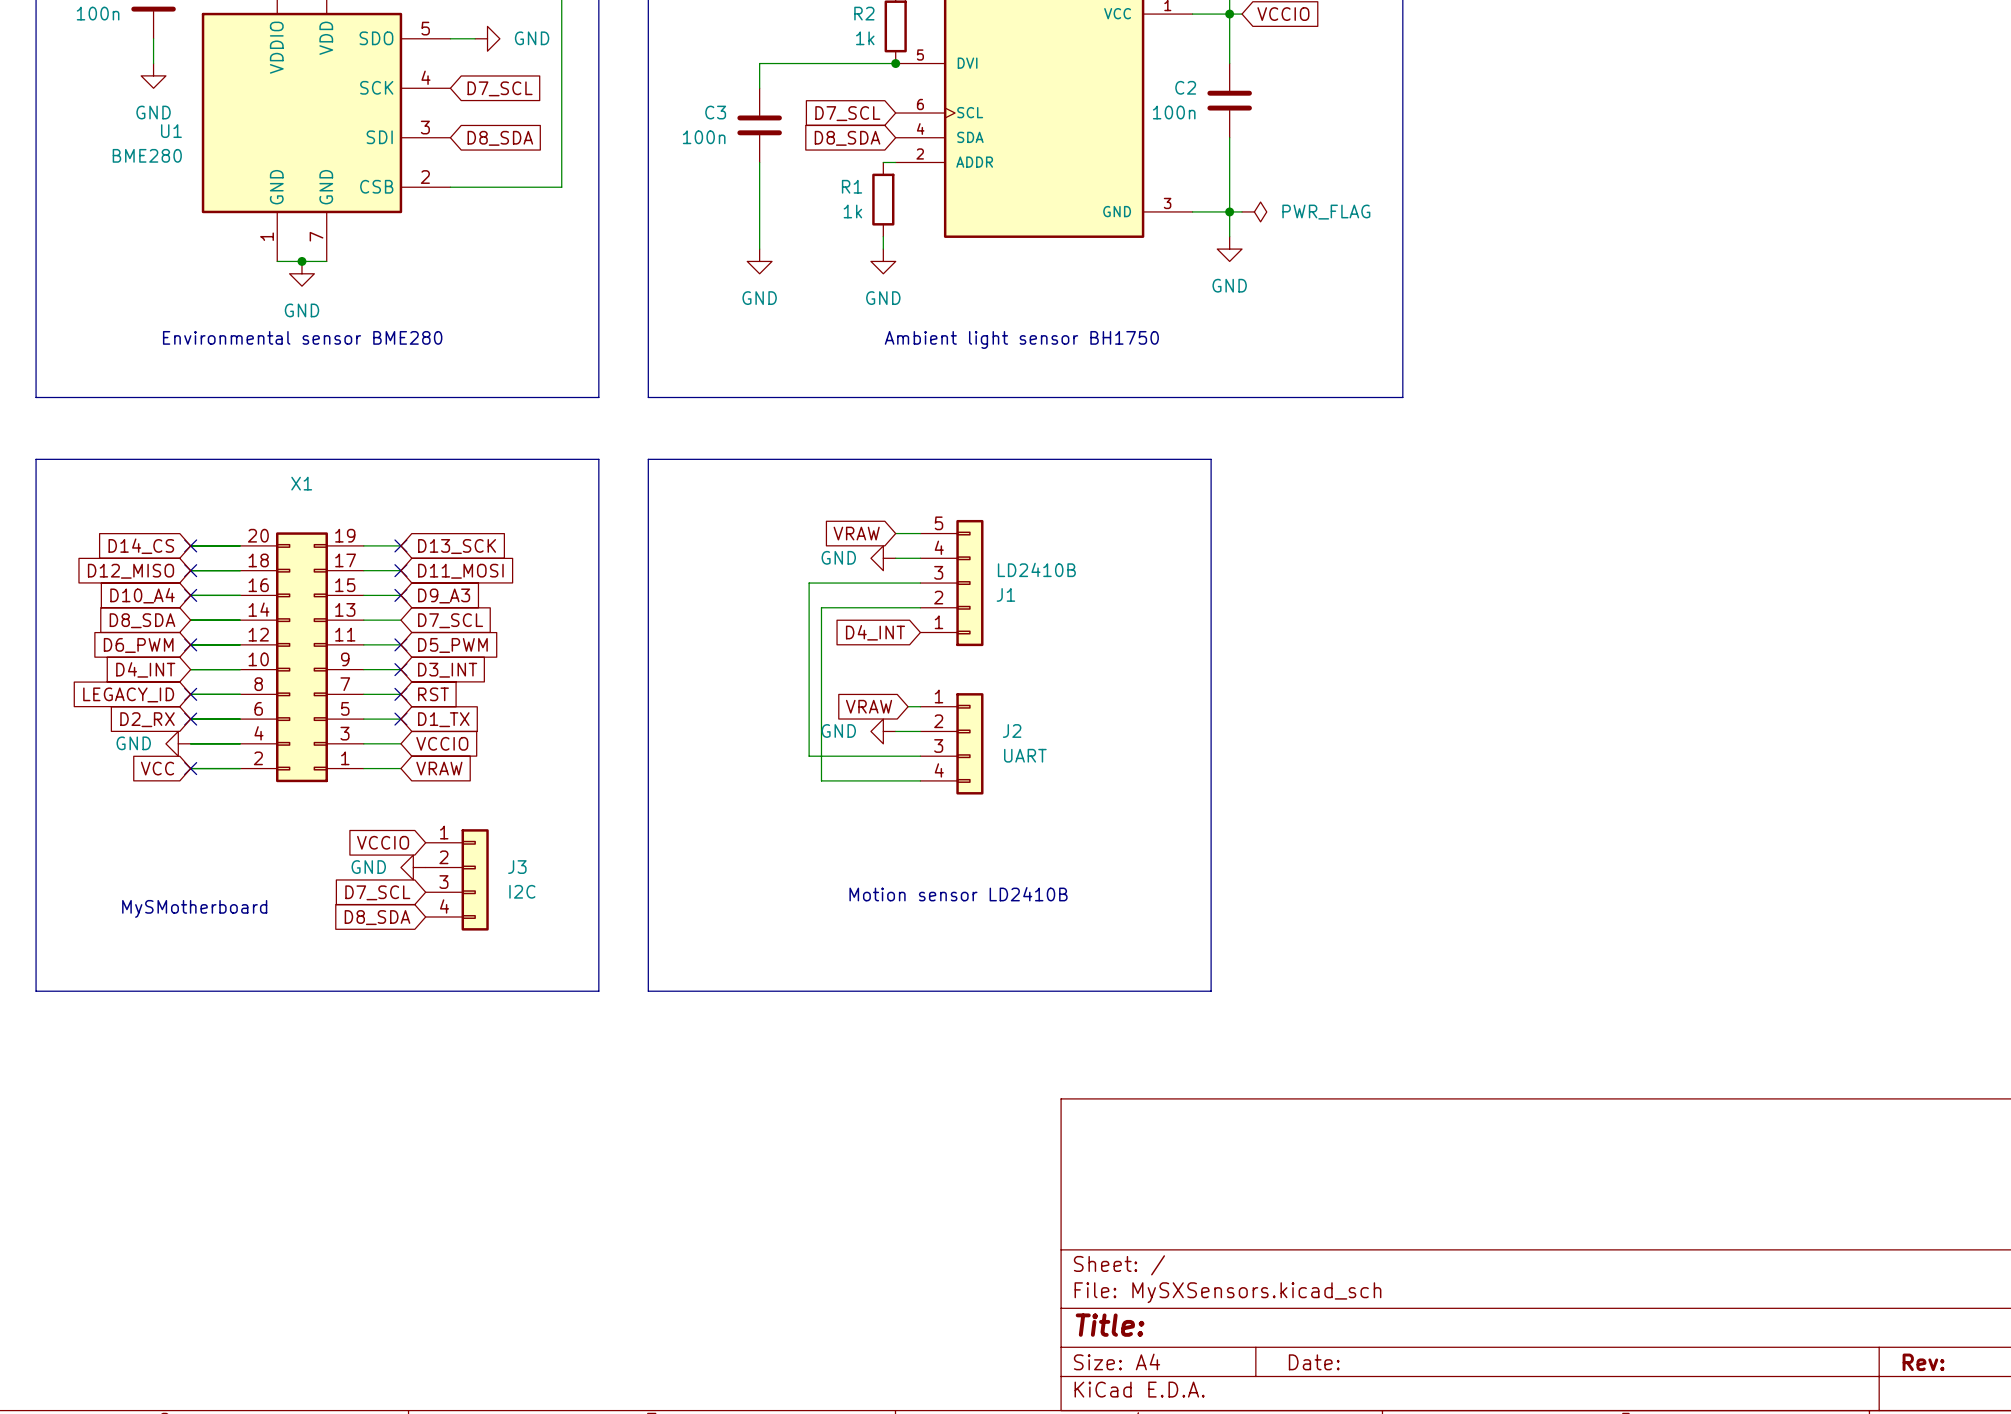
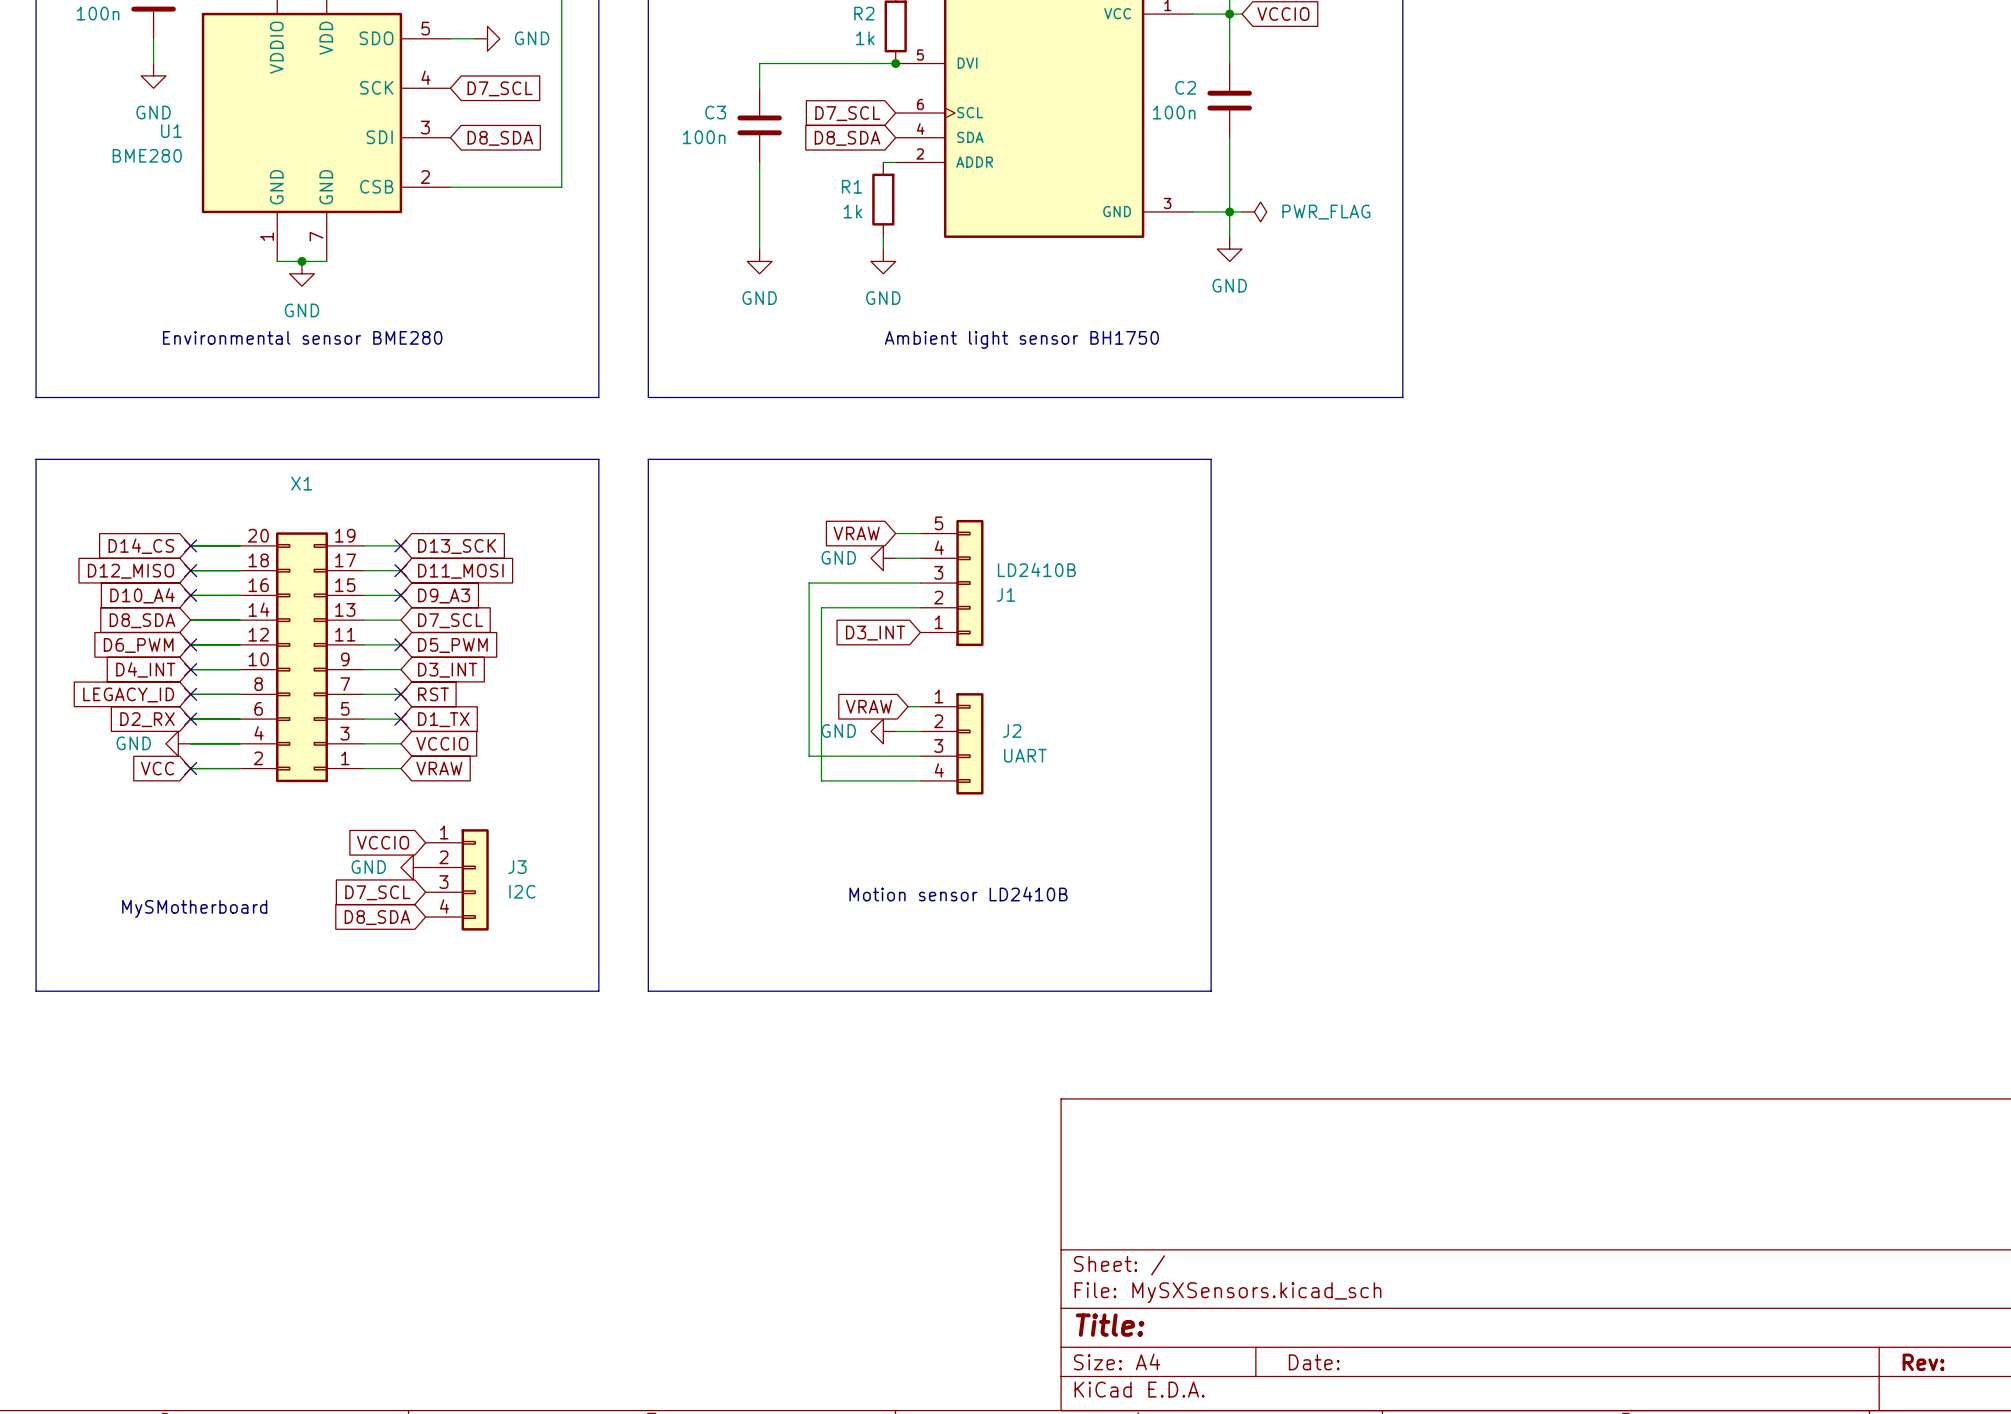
global label: D4_INT (875, 632) -> D3_INT (875, 633)
no-connect mark: none -> (190, 669)
no-connect mark: (400, 669) -> none

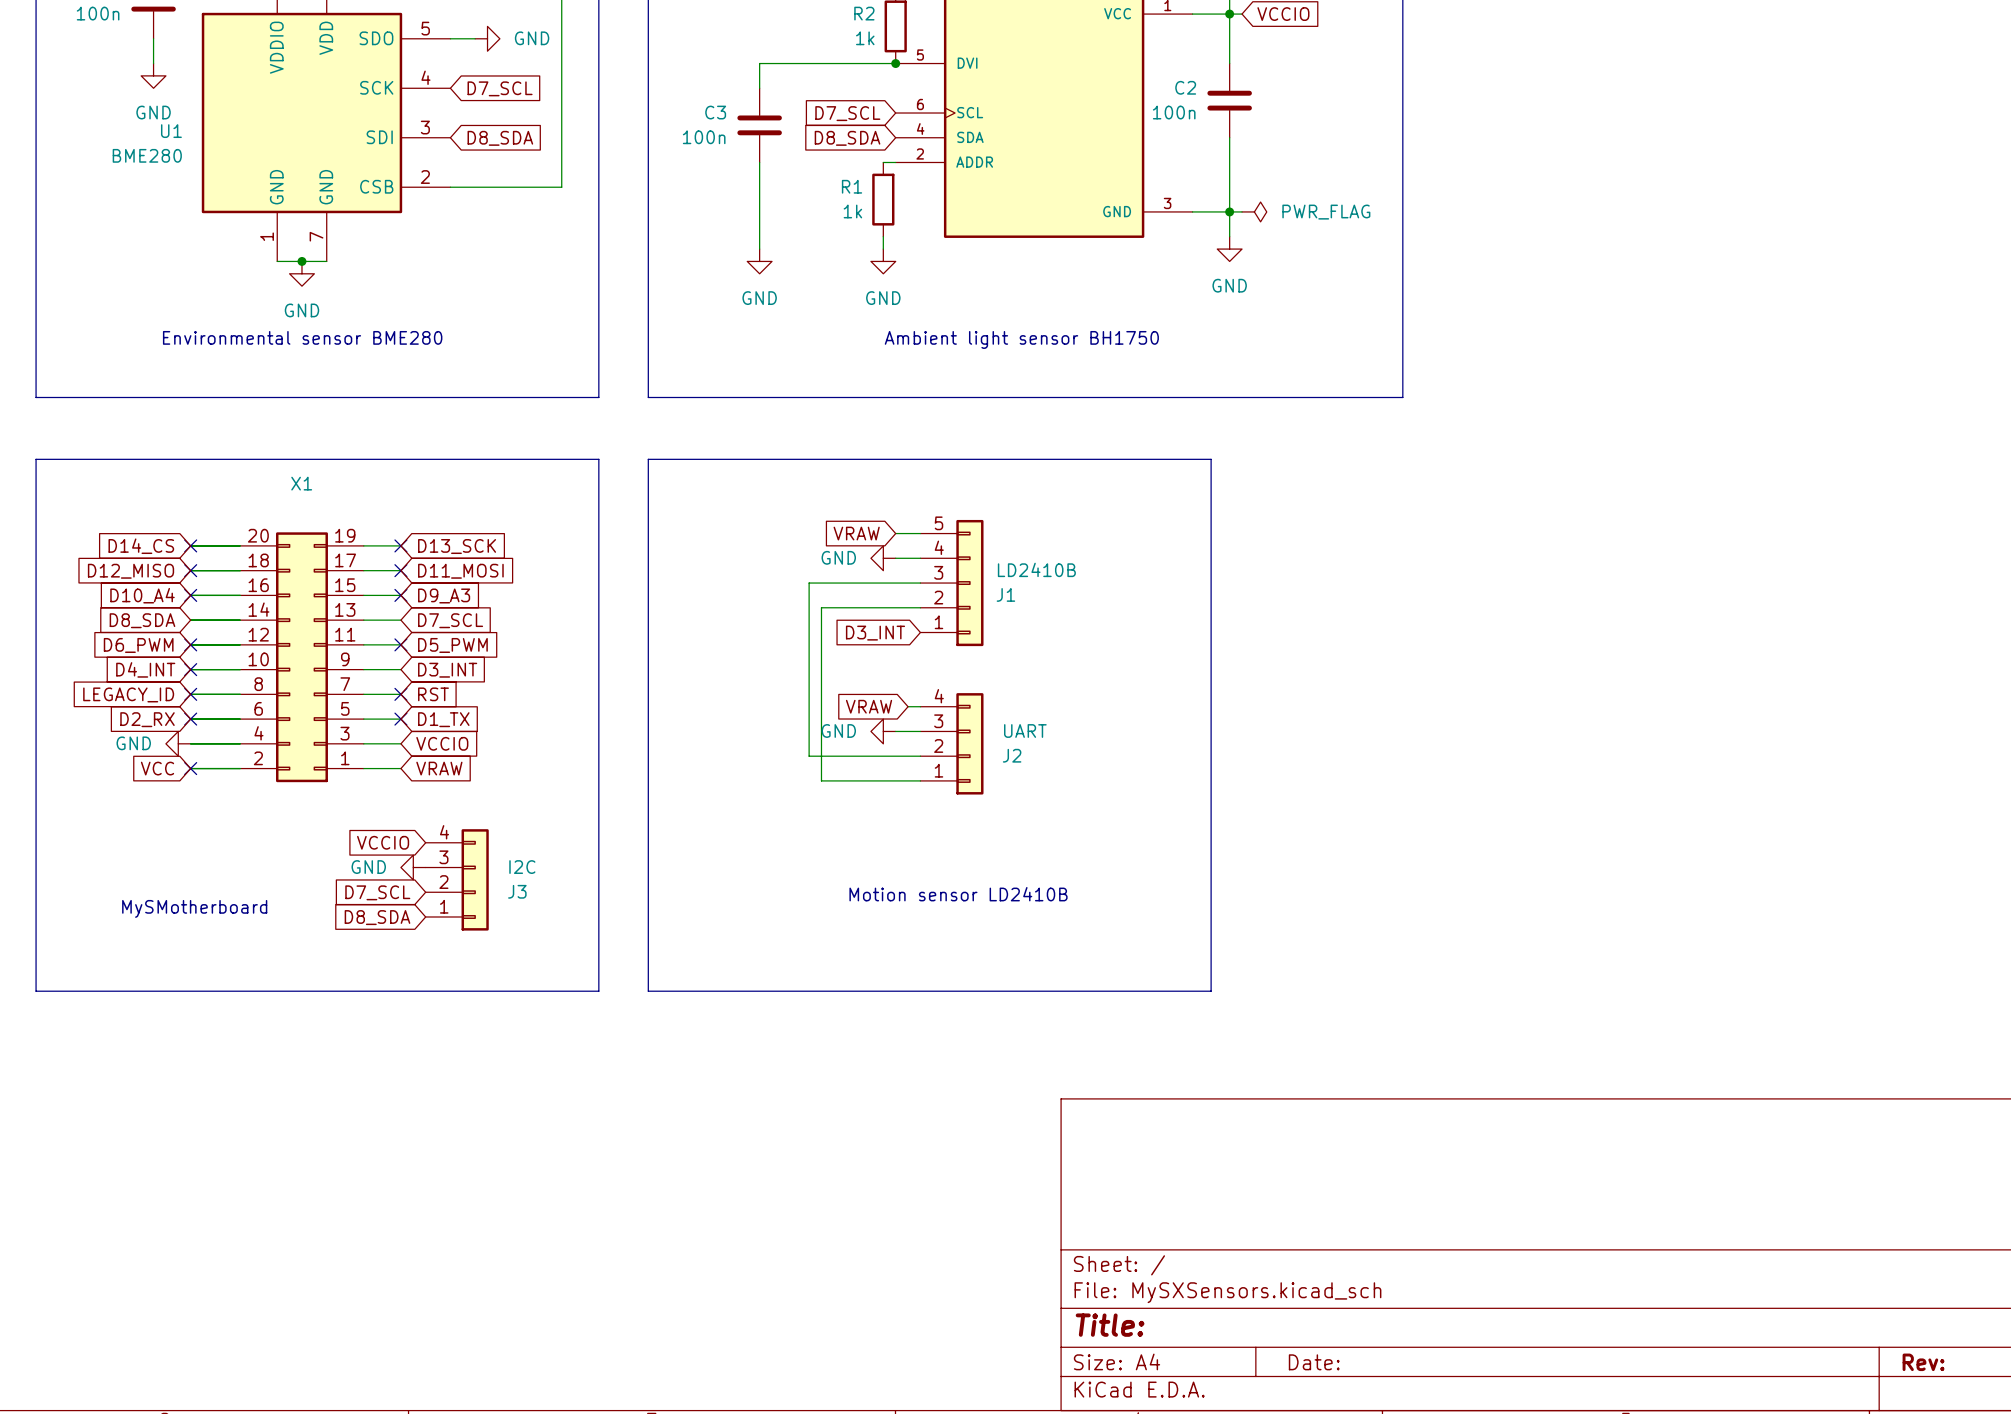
J2 flip: as is (969, 743) -> up-down (969, 743)
J3 flip: as is (475, 879) -> up-down (475, 879)

